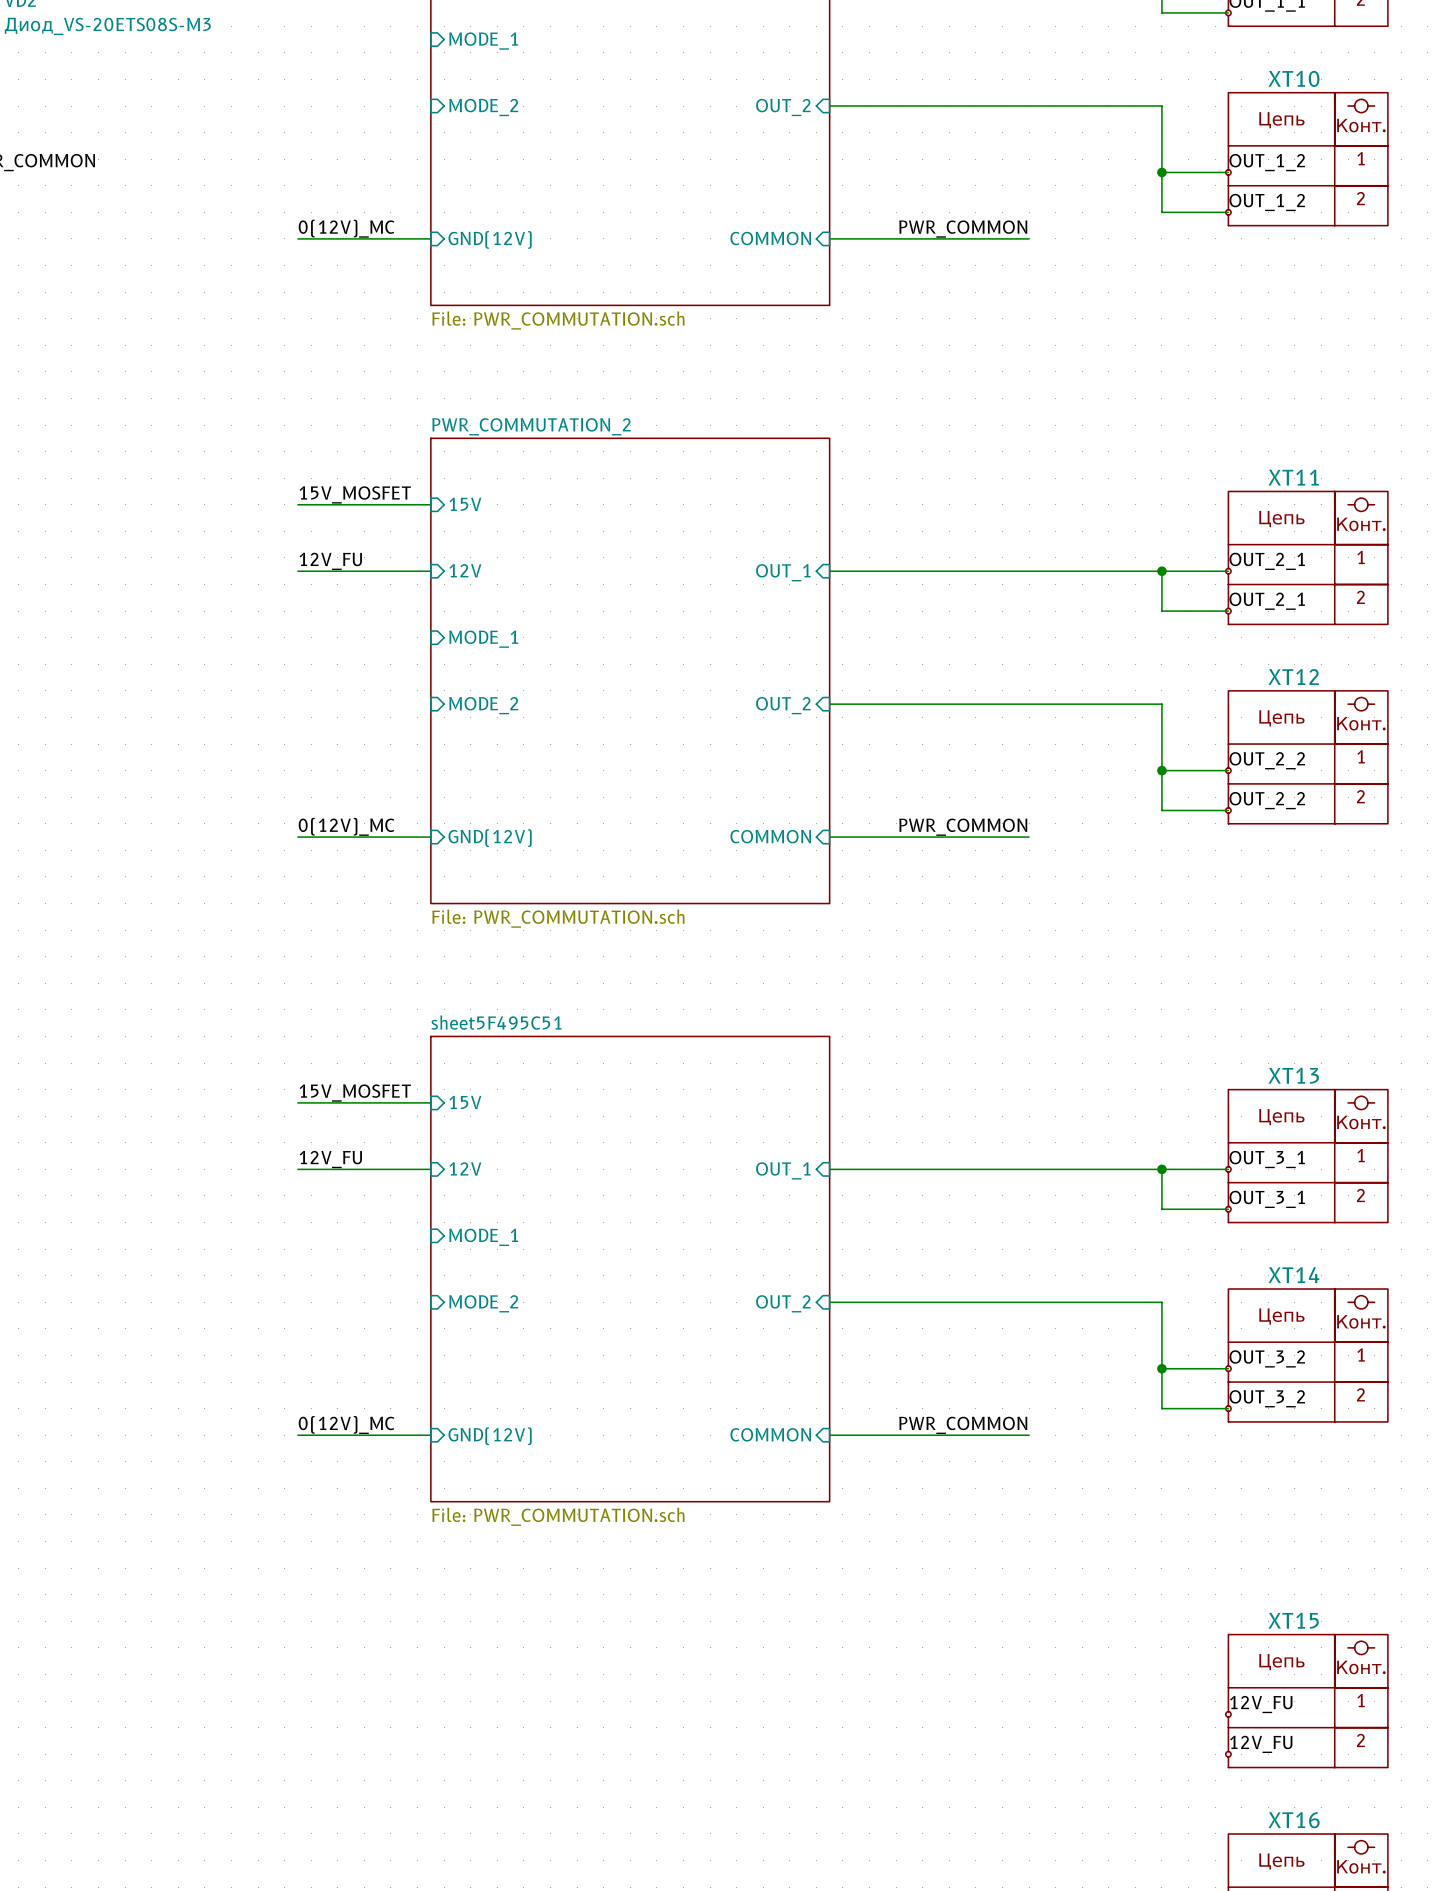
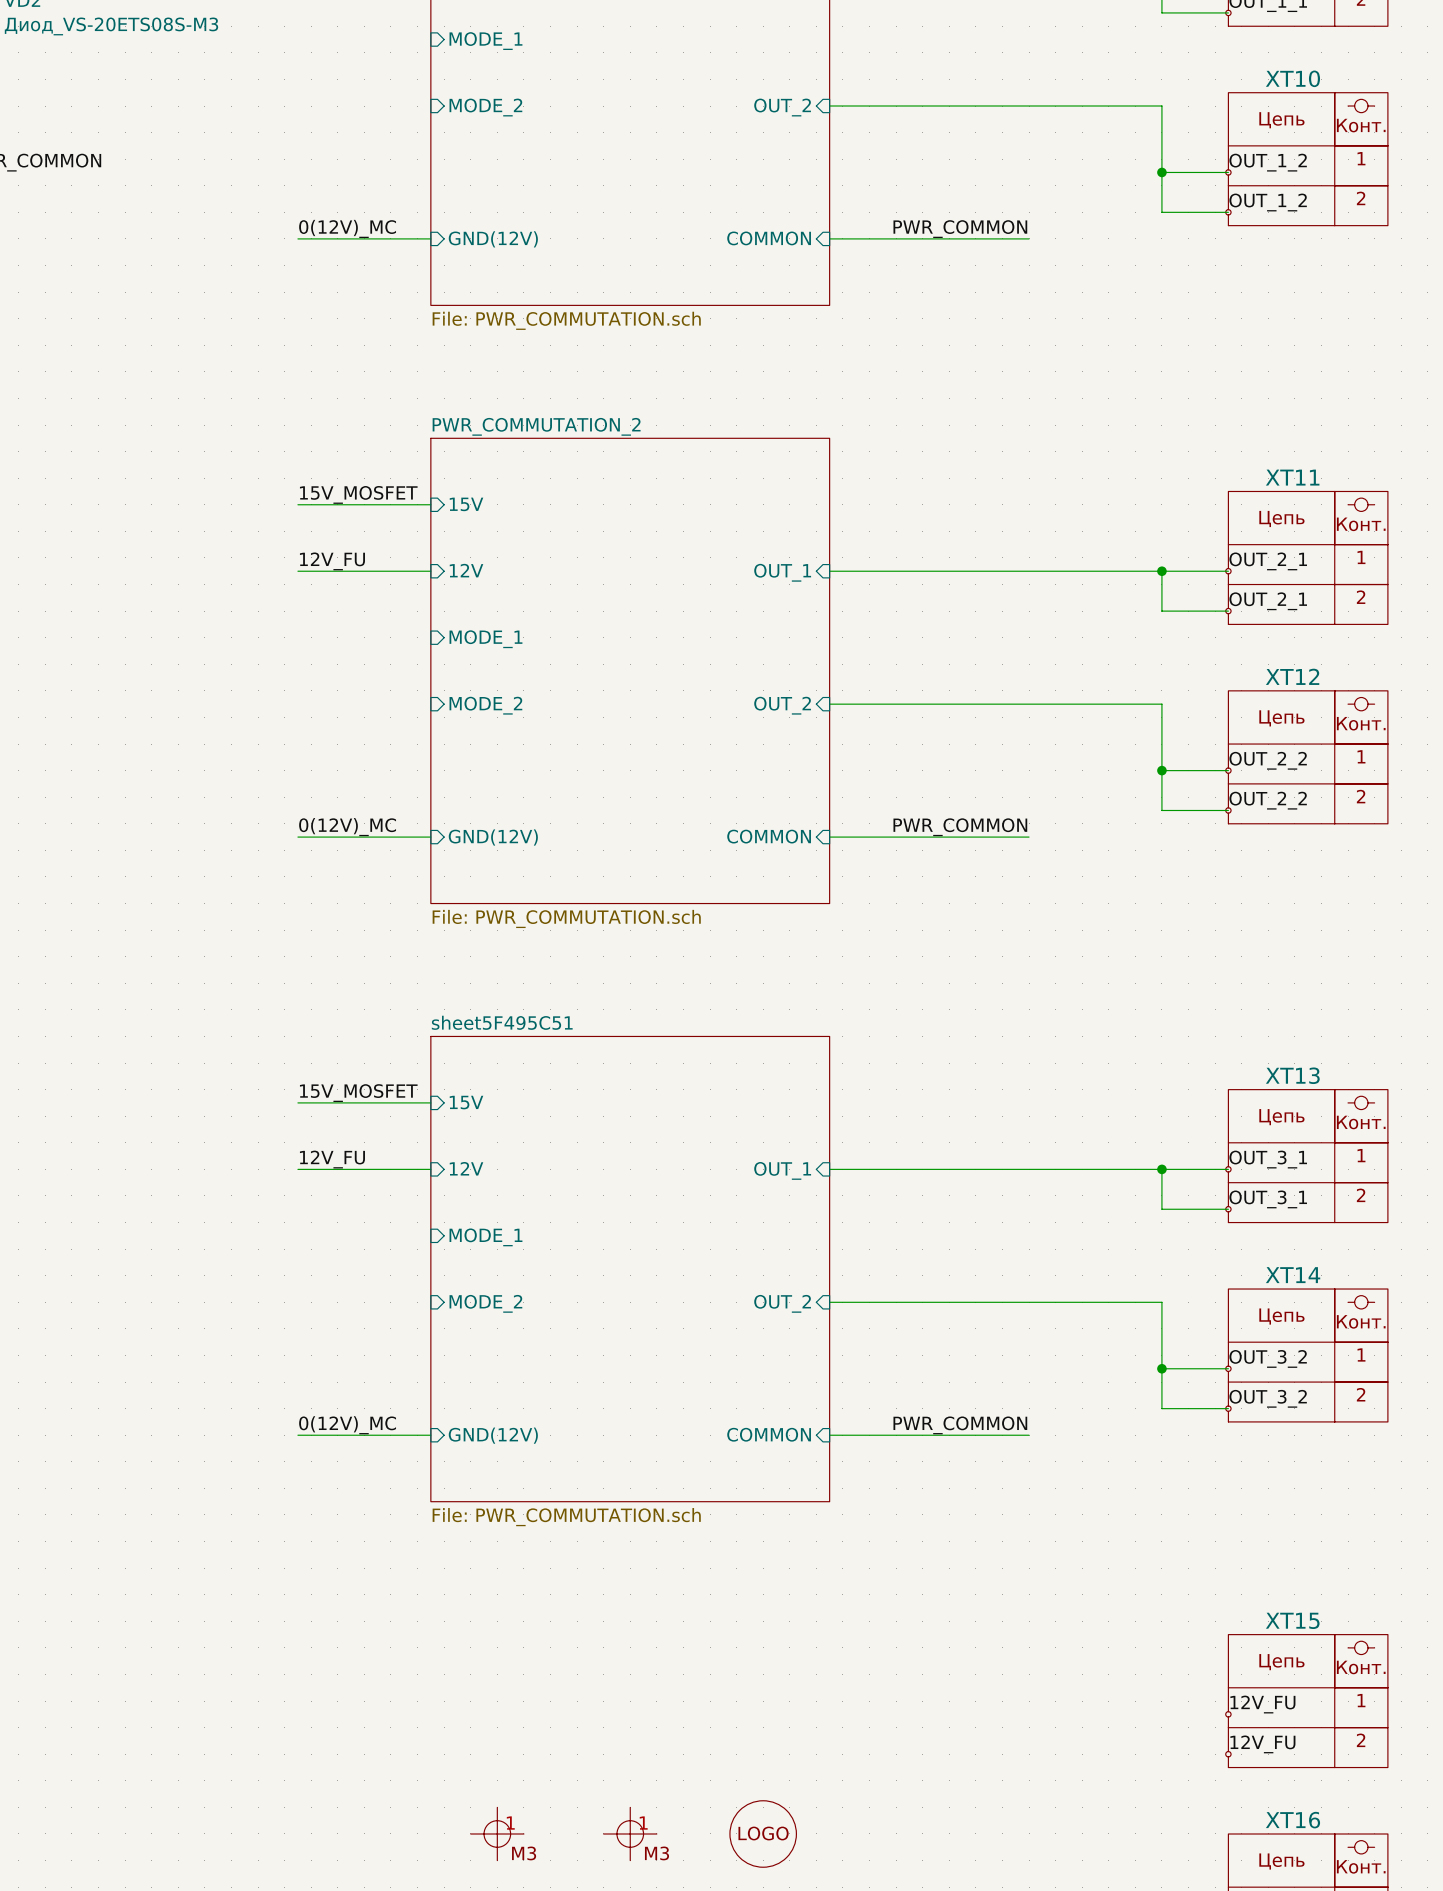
part: none -> (497, 1833)
part: none -> (630, 1833)
part: none -> (763, 1833)

